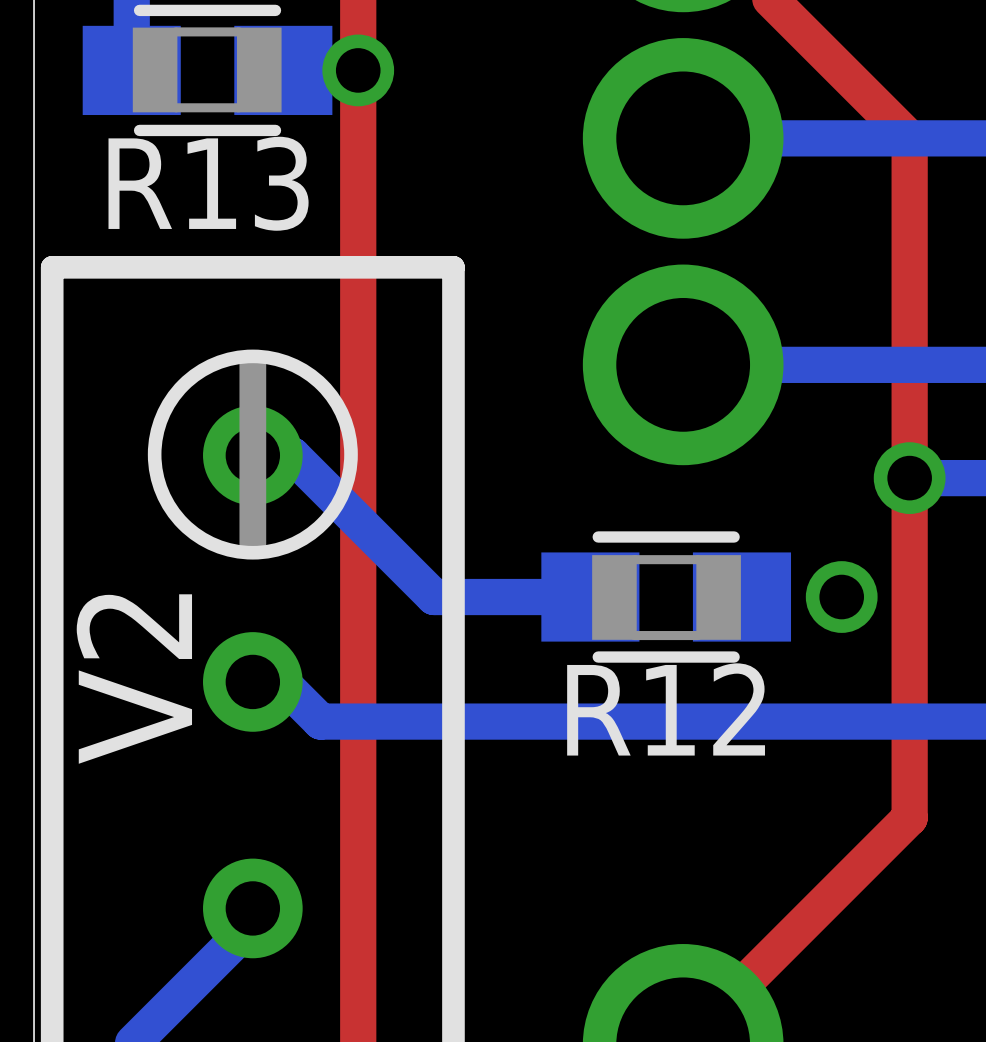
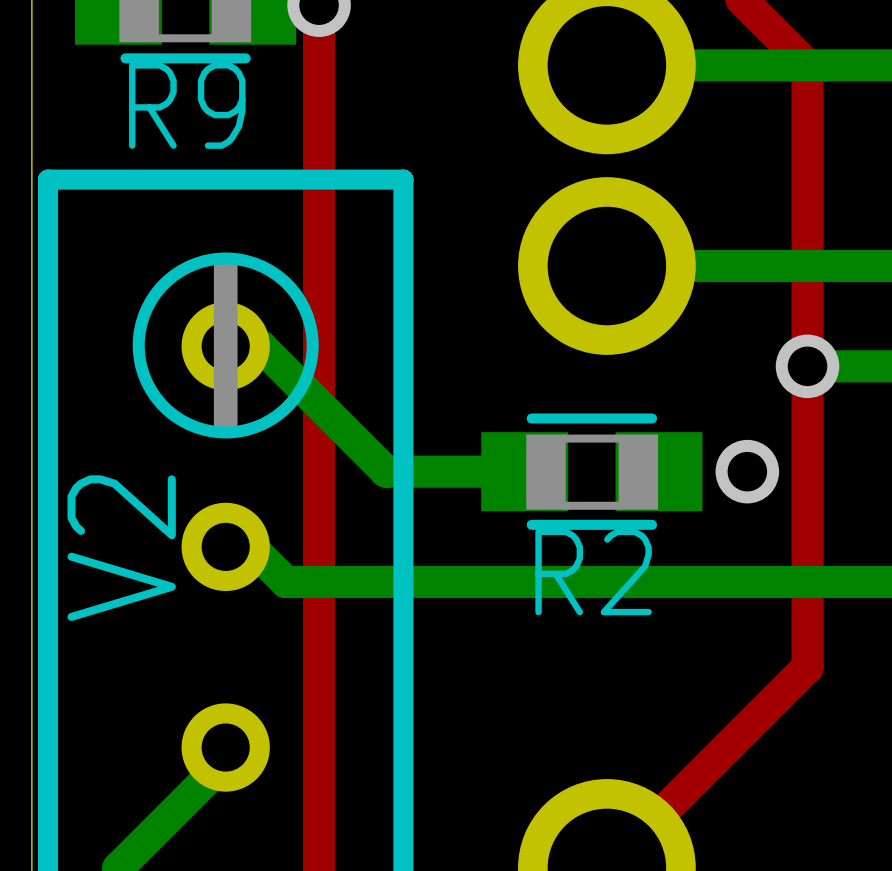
R13 name: R13 (208, 183) -> R9 (187, 105)
R12 name: R12 (666, 709) -> R2 (593, 571)

